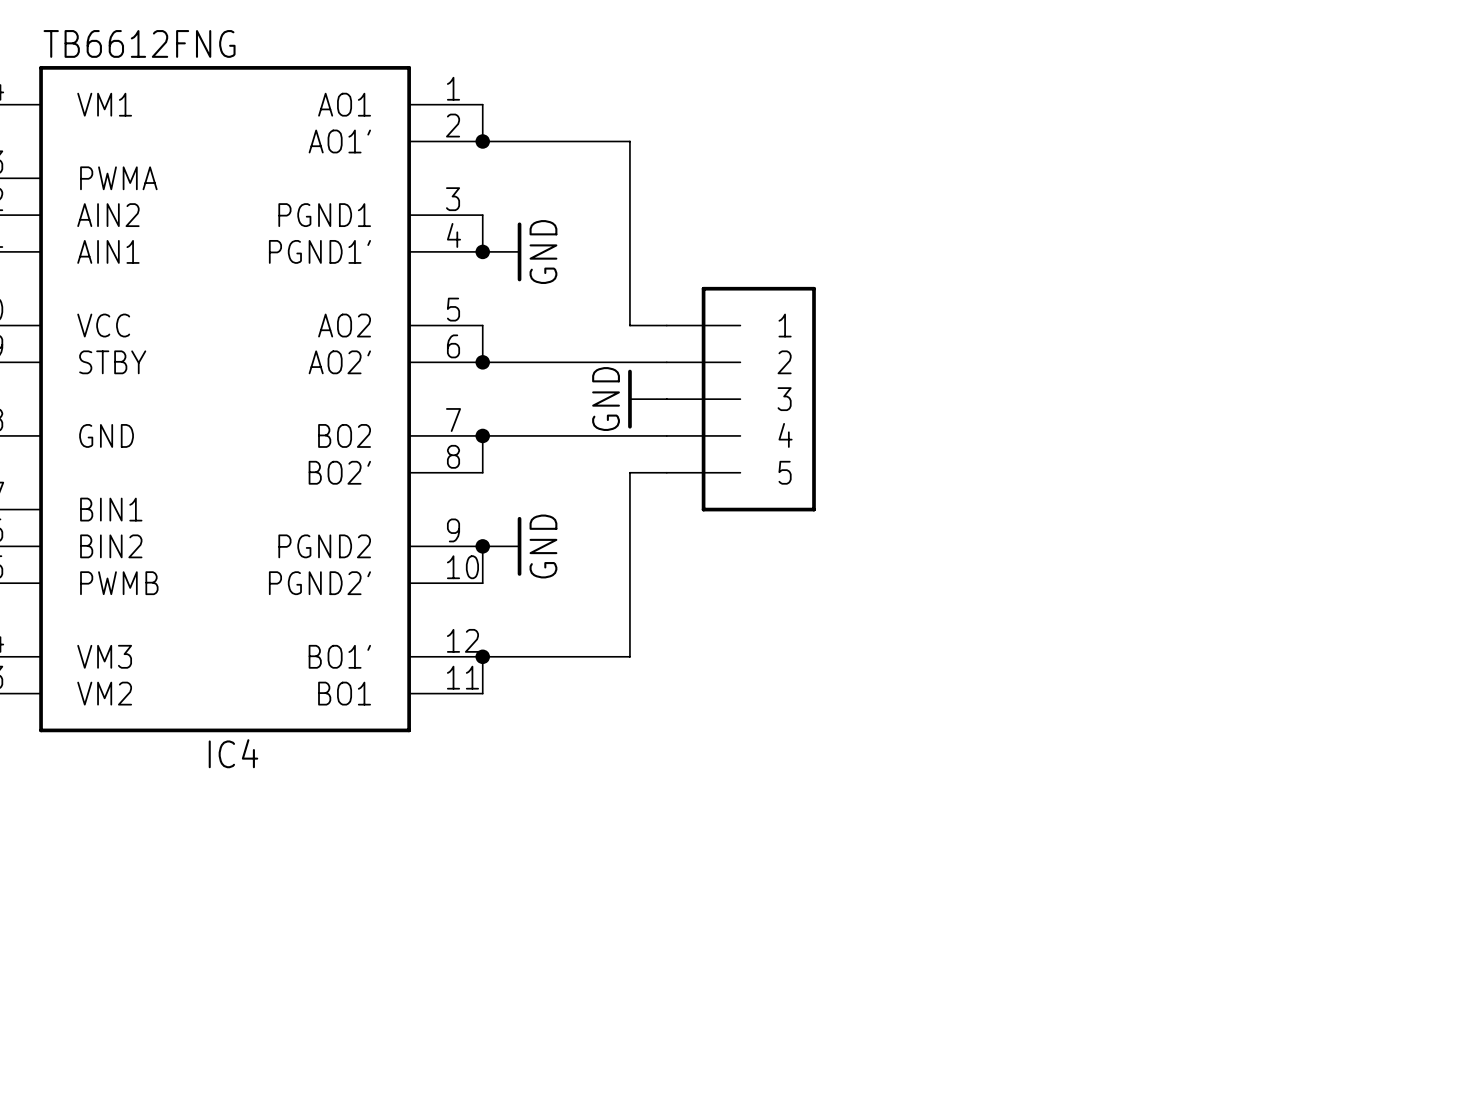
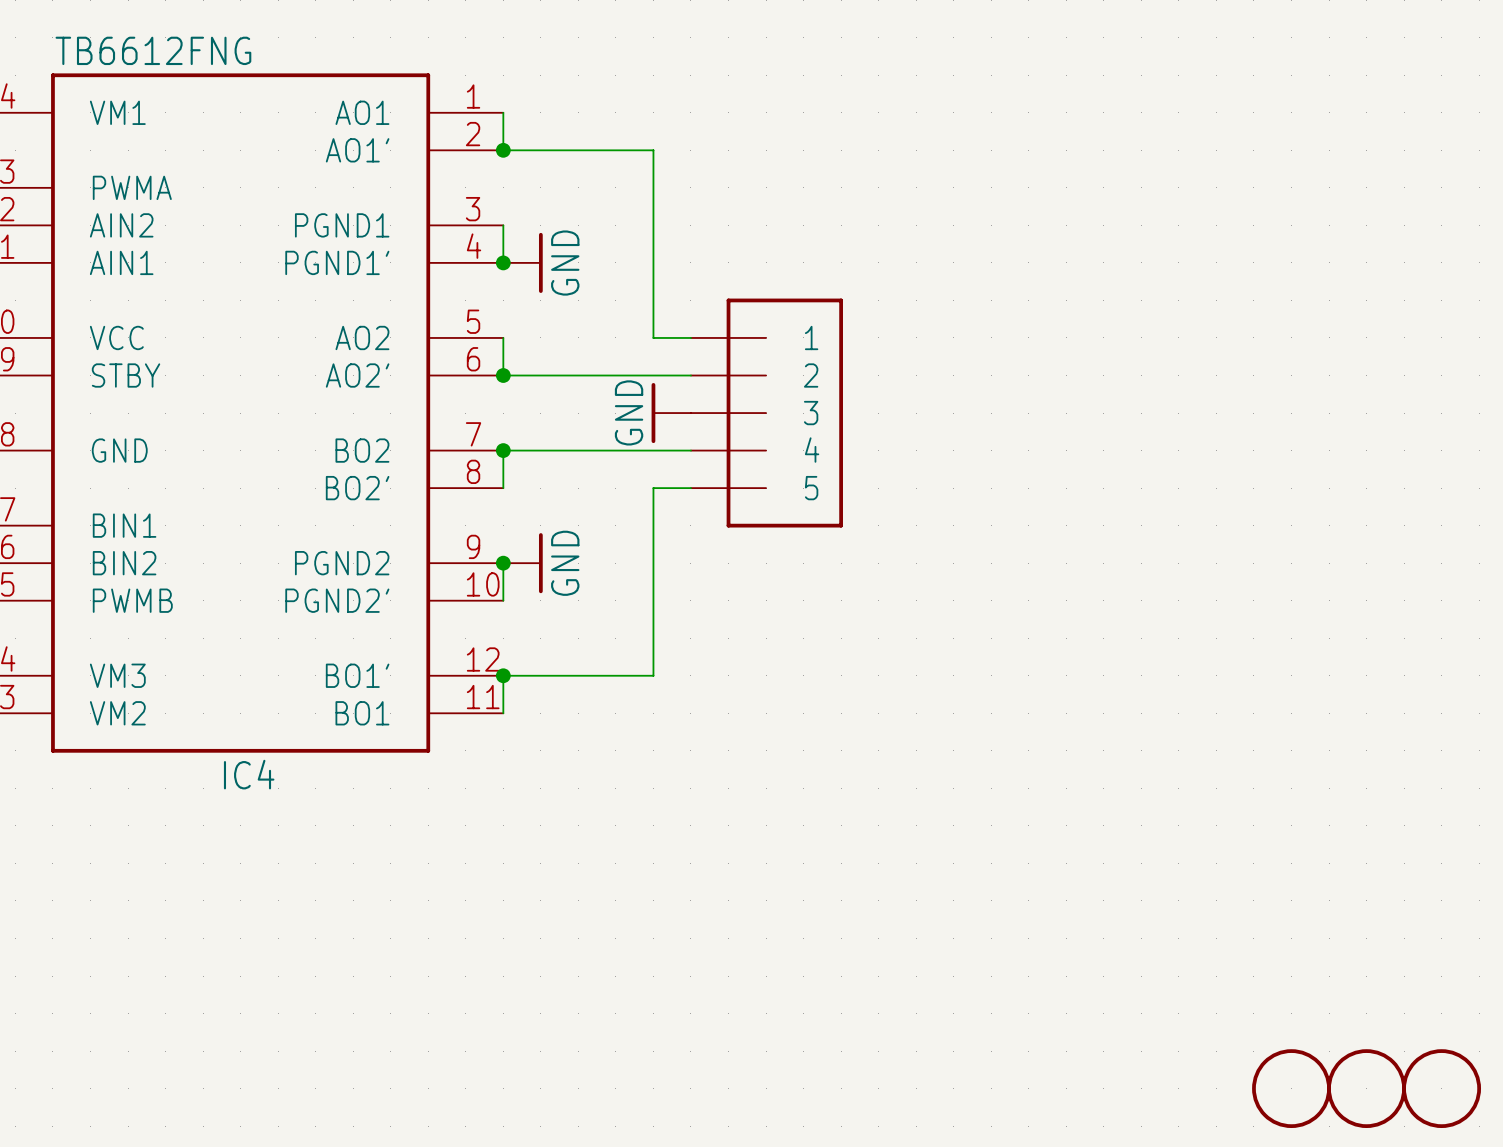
part: none -> (1291, 1088)
part: none -> (1366, 1088)
part: none -> (1441, 1088)

